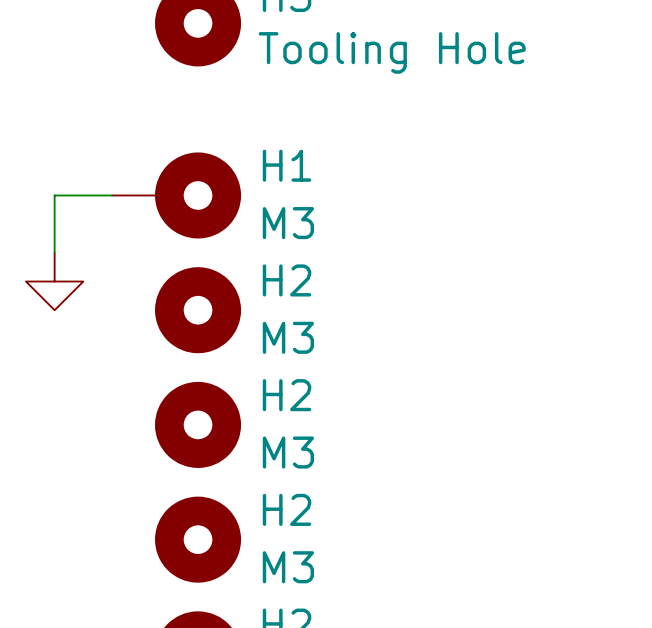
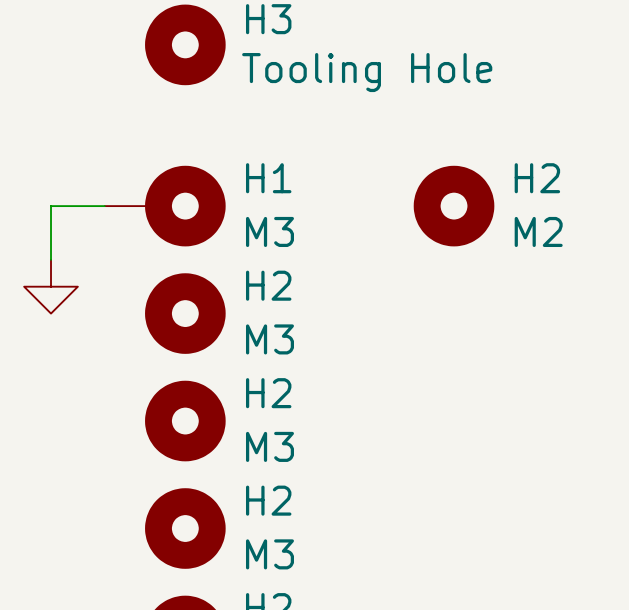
H2: none -> M2 (454, 206)

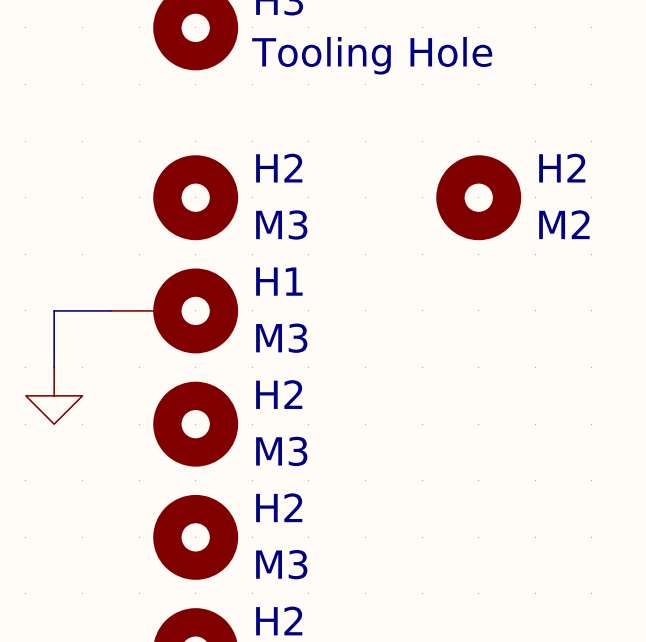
wire: (104, 206) (51, 206) (51, 259) -> (110, 310) (54, 310) (54, 367)
H1 position: (165, 206) -> (174, 310)
power symbol position: (51, 286) -> (54, 395)
H2 position: (185, 313) -> (195, 197)

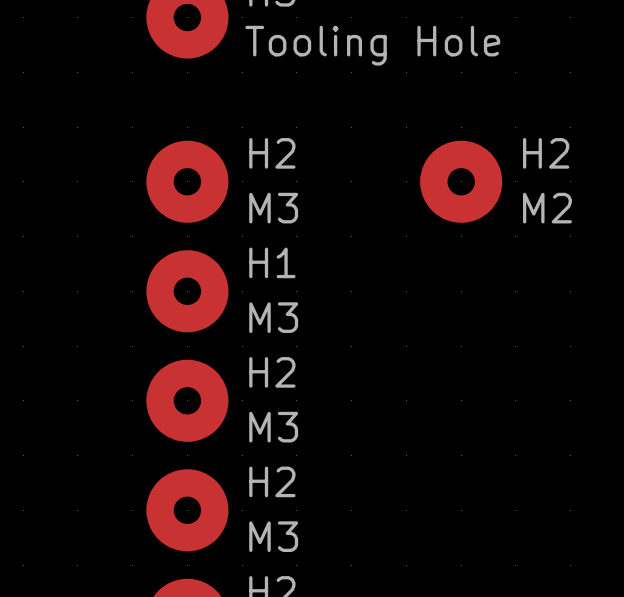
H1 symbol: [110, 268, 239, 354] -> [146, 250, 229, 333]
wire: (110, 310) (54, 310) (54, 367) -> none
power symbol: (54, 395) -> none

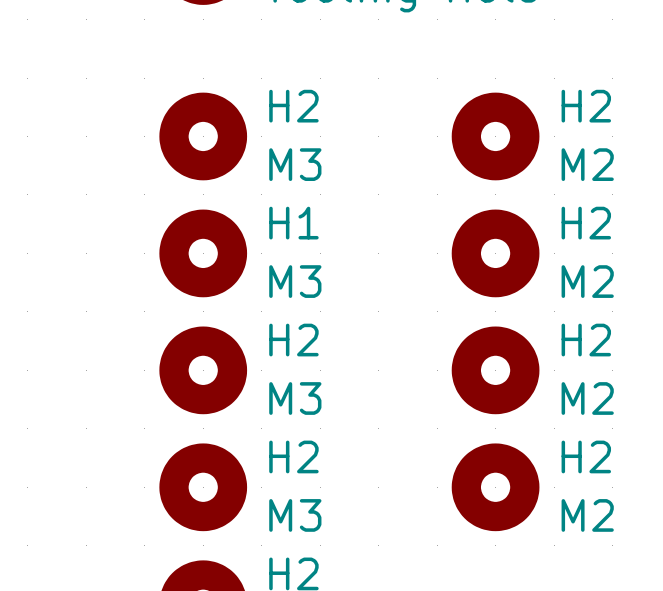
H2: none -> M2 (495, 253)
H2: none -> M2 (495, 370)
H2: none -> M2 (495, 487)

